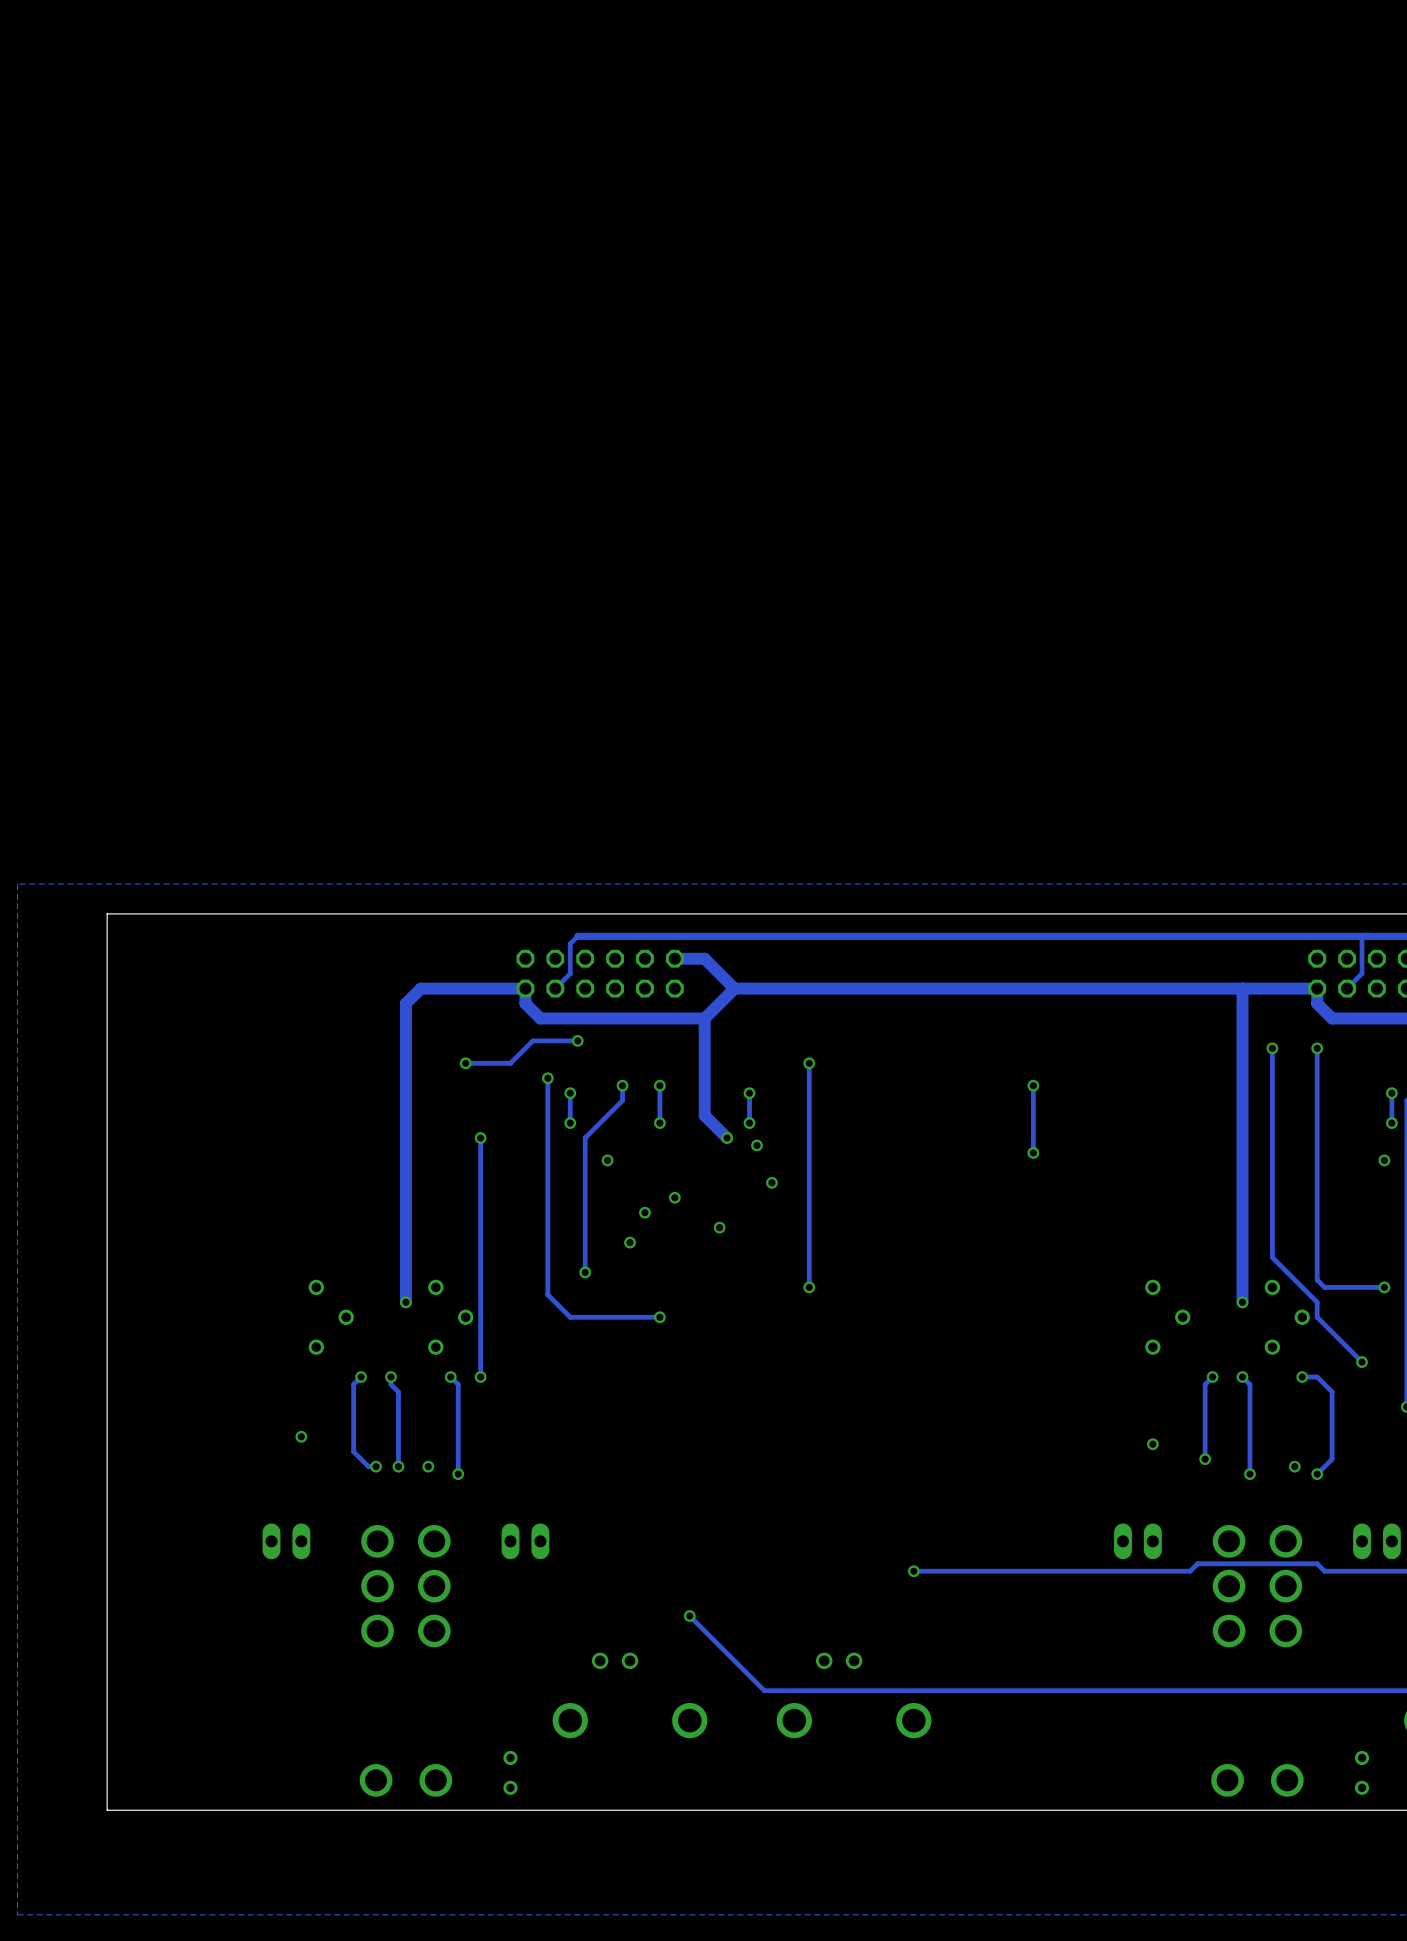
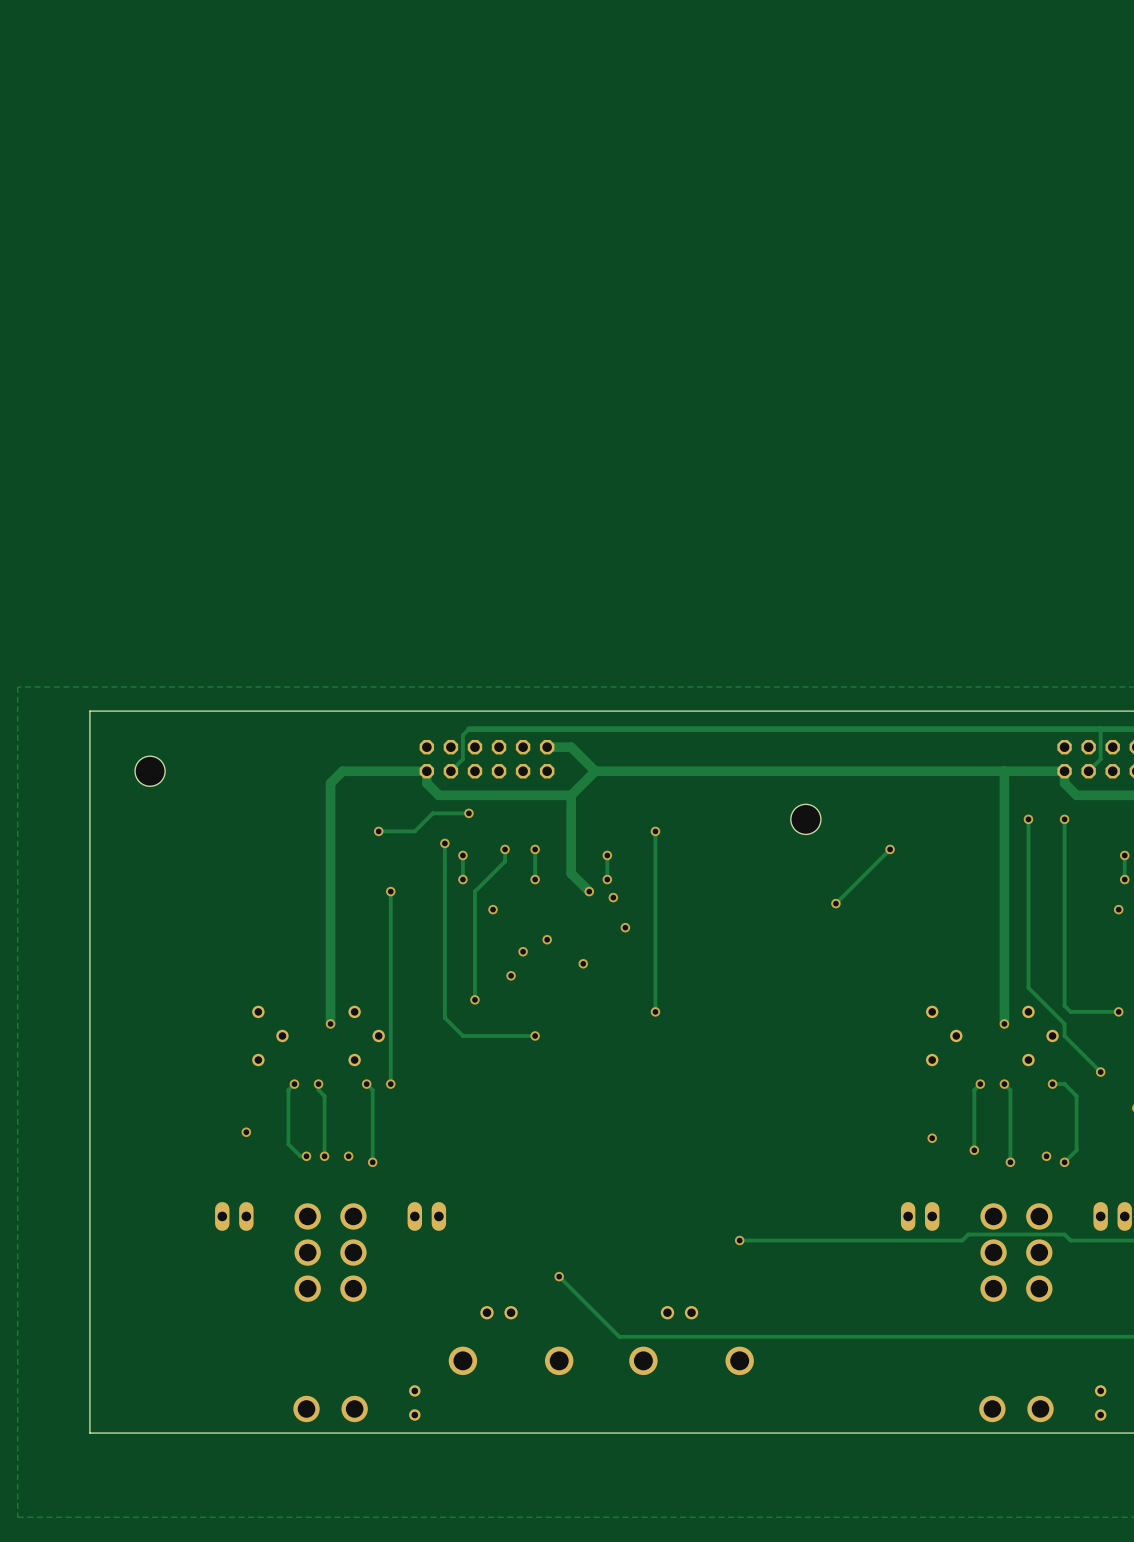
hole: none -> (150, 771)
hole: none -> (805, 819)
track: (1033, 1085) (1033, 1152) -> (890, 849) (835, 903)
via position: (1033, 1085) -> (890, 849)

